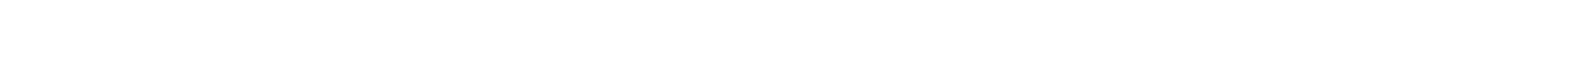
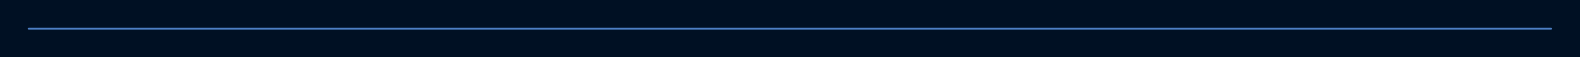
bottom track: none -> (1551, 28) (28, 28)

